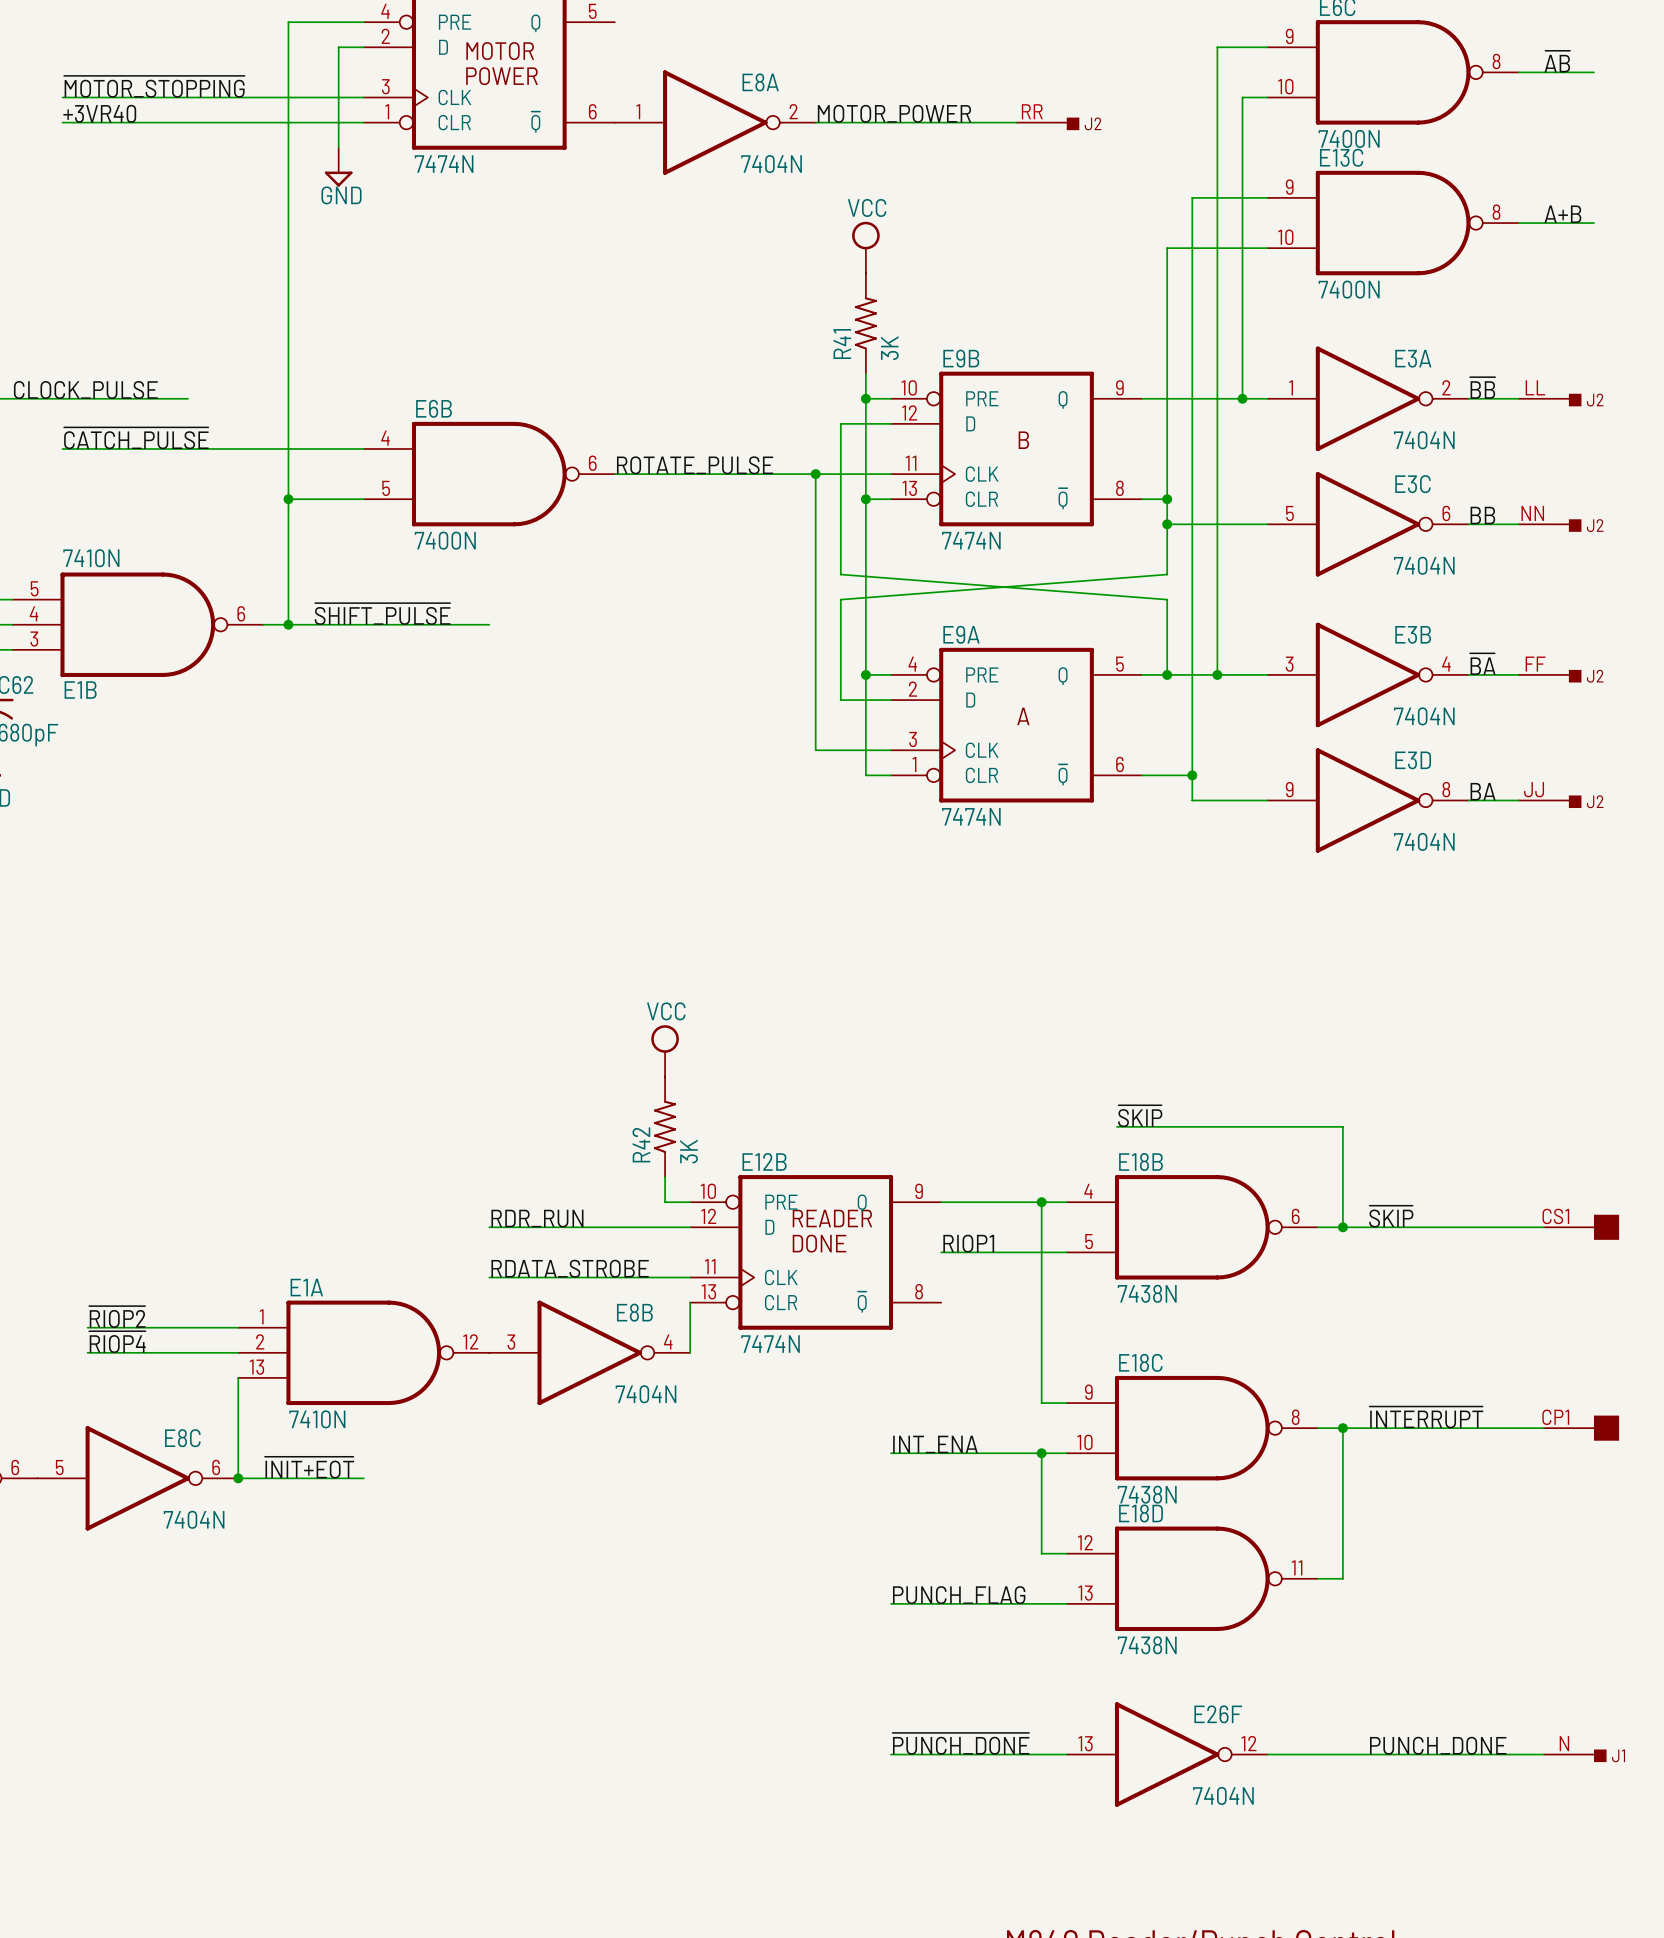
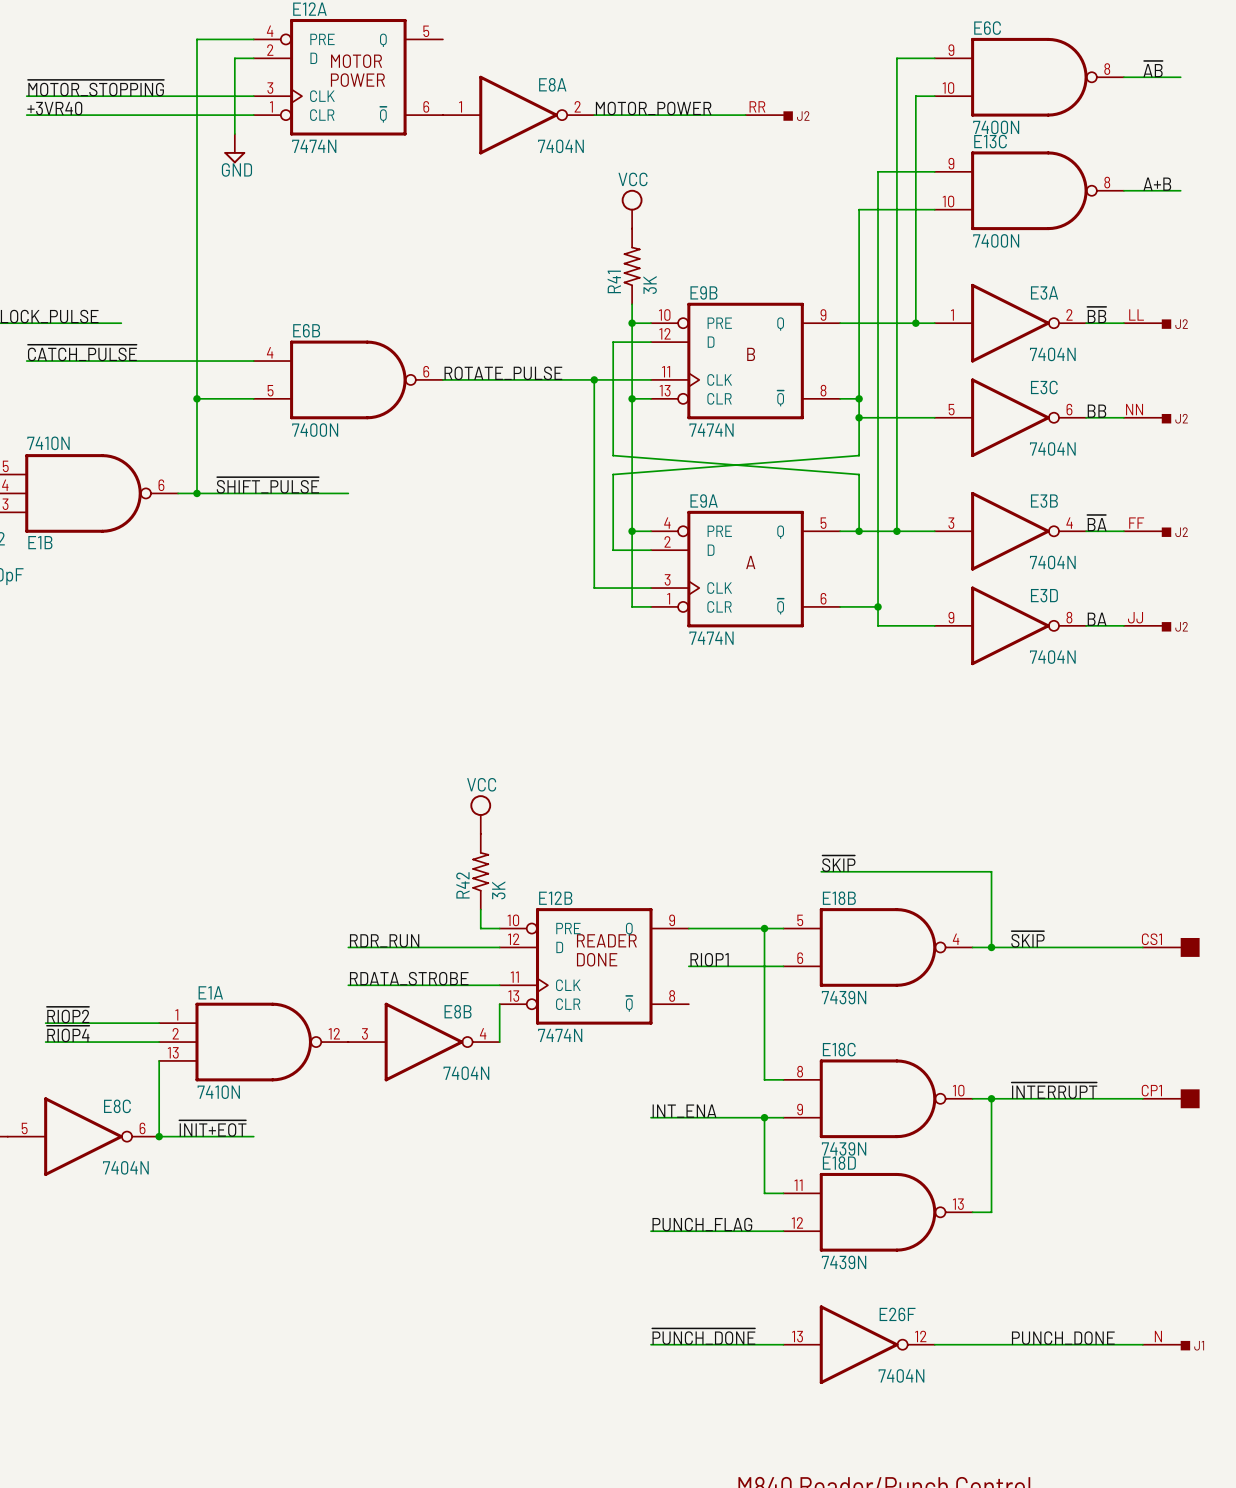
E18B pin number: 4 (1088, 1191) -> 5 (800, 920)
E18B pin number: 6 (1295, 1216) -> 4 (956, 939)
E18B pin number: 5 (1089, 1241) -> 6 (800, 958)
E18B value: 7438N (1147, 1293) -> 7439N (844, 997)
E18C pin number: 9 (1088, 1392) -> 8 (800, 1071)
E18C pin number: 8 (1295, 1417) -> 10 (958, 1090)
E18C pin number: 10 (1084, 1442) -> 9 (800, 1109)
E18C value: 7438N (1147, 1494) -> 7439N (844, 1148)
E18D pin number: 12 (1085, 1542) -> 11 (798, 1185)
E18D pin number: 11 (1297, 1567) -> 13 (958, 1204)
E18D pin number: 13 (1085, 1593) -> 12 (797, 1222)
E18D value: 7438N (1147, 1645) -> 7439N (844, 1262)

